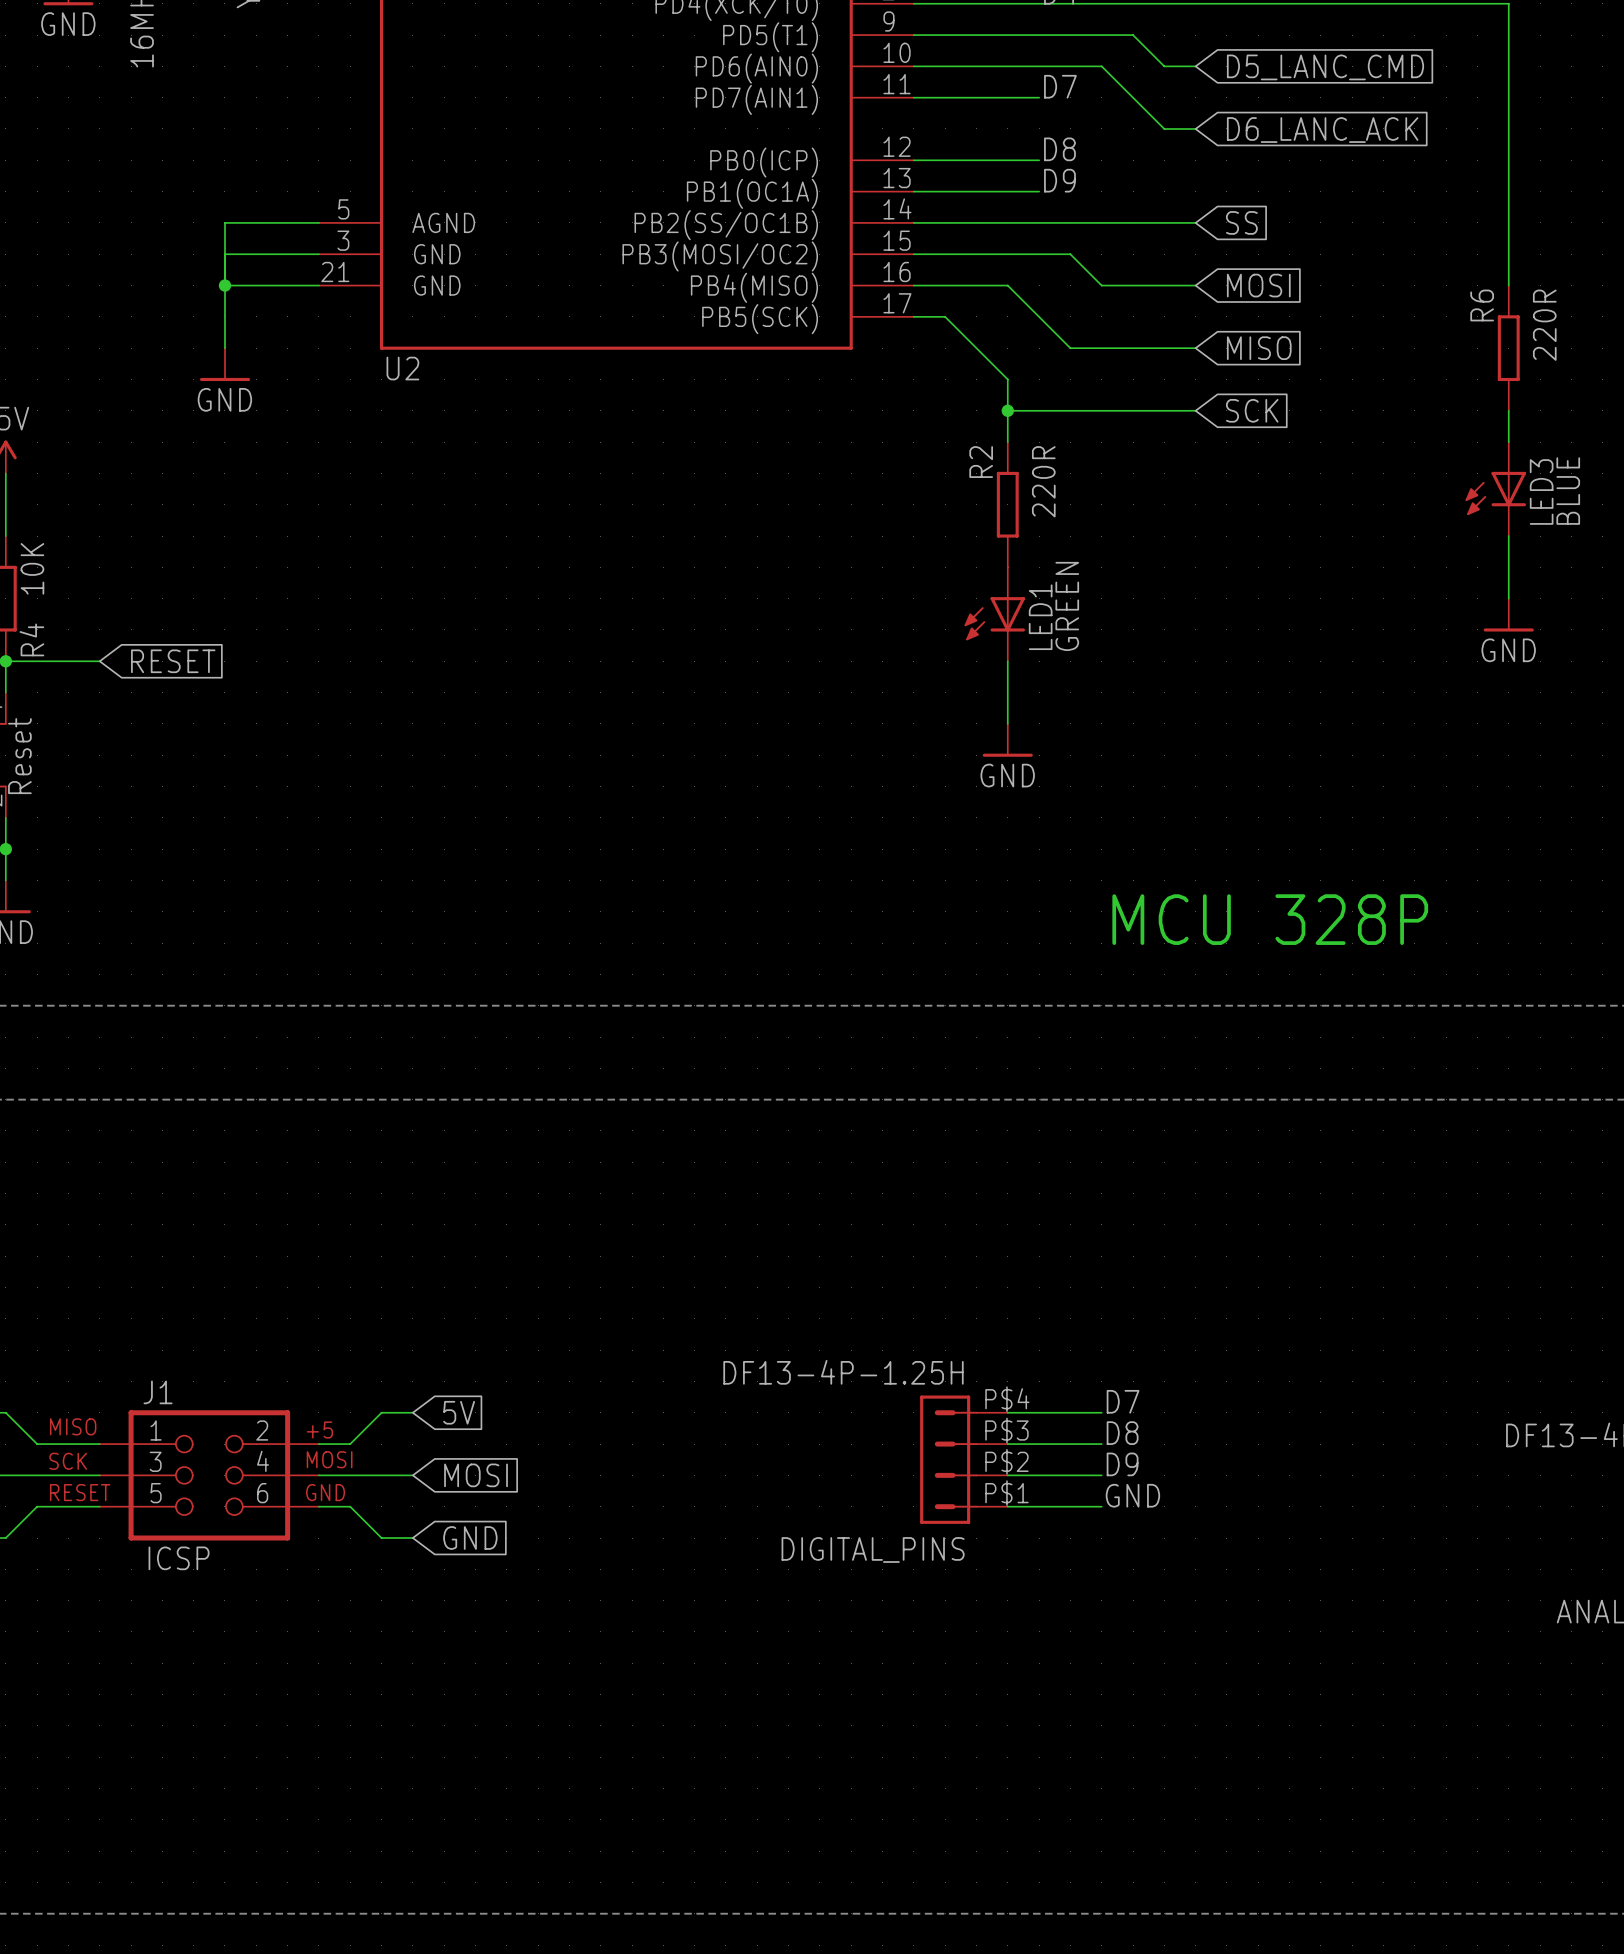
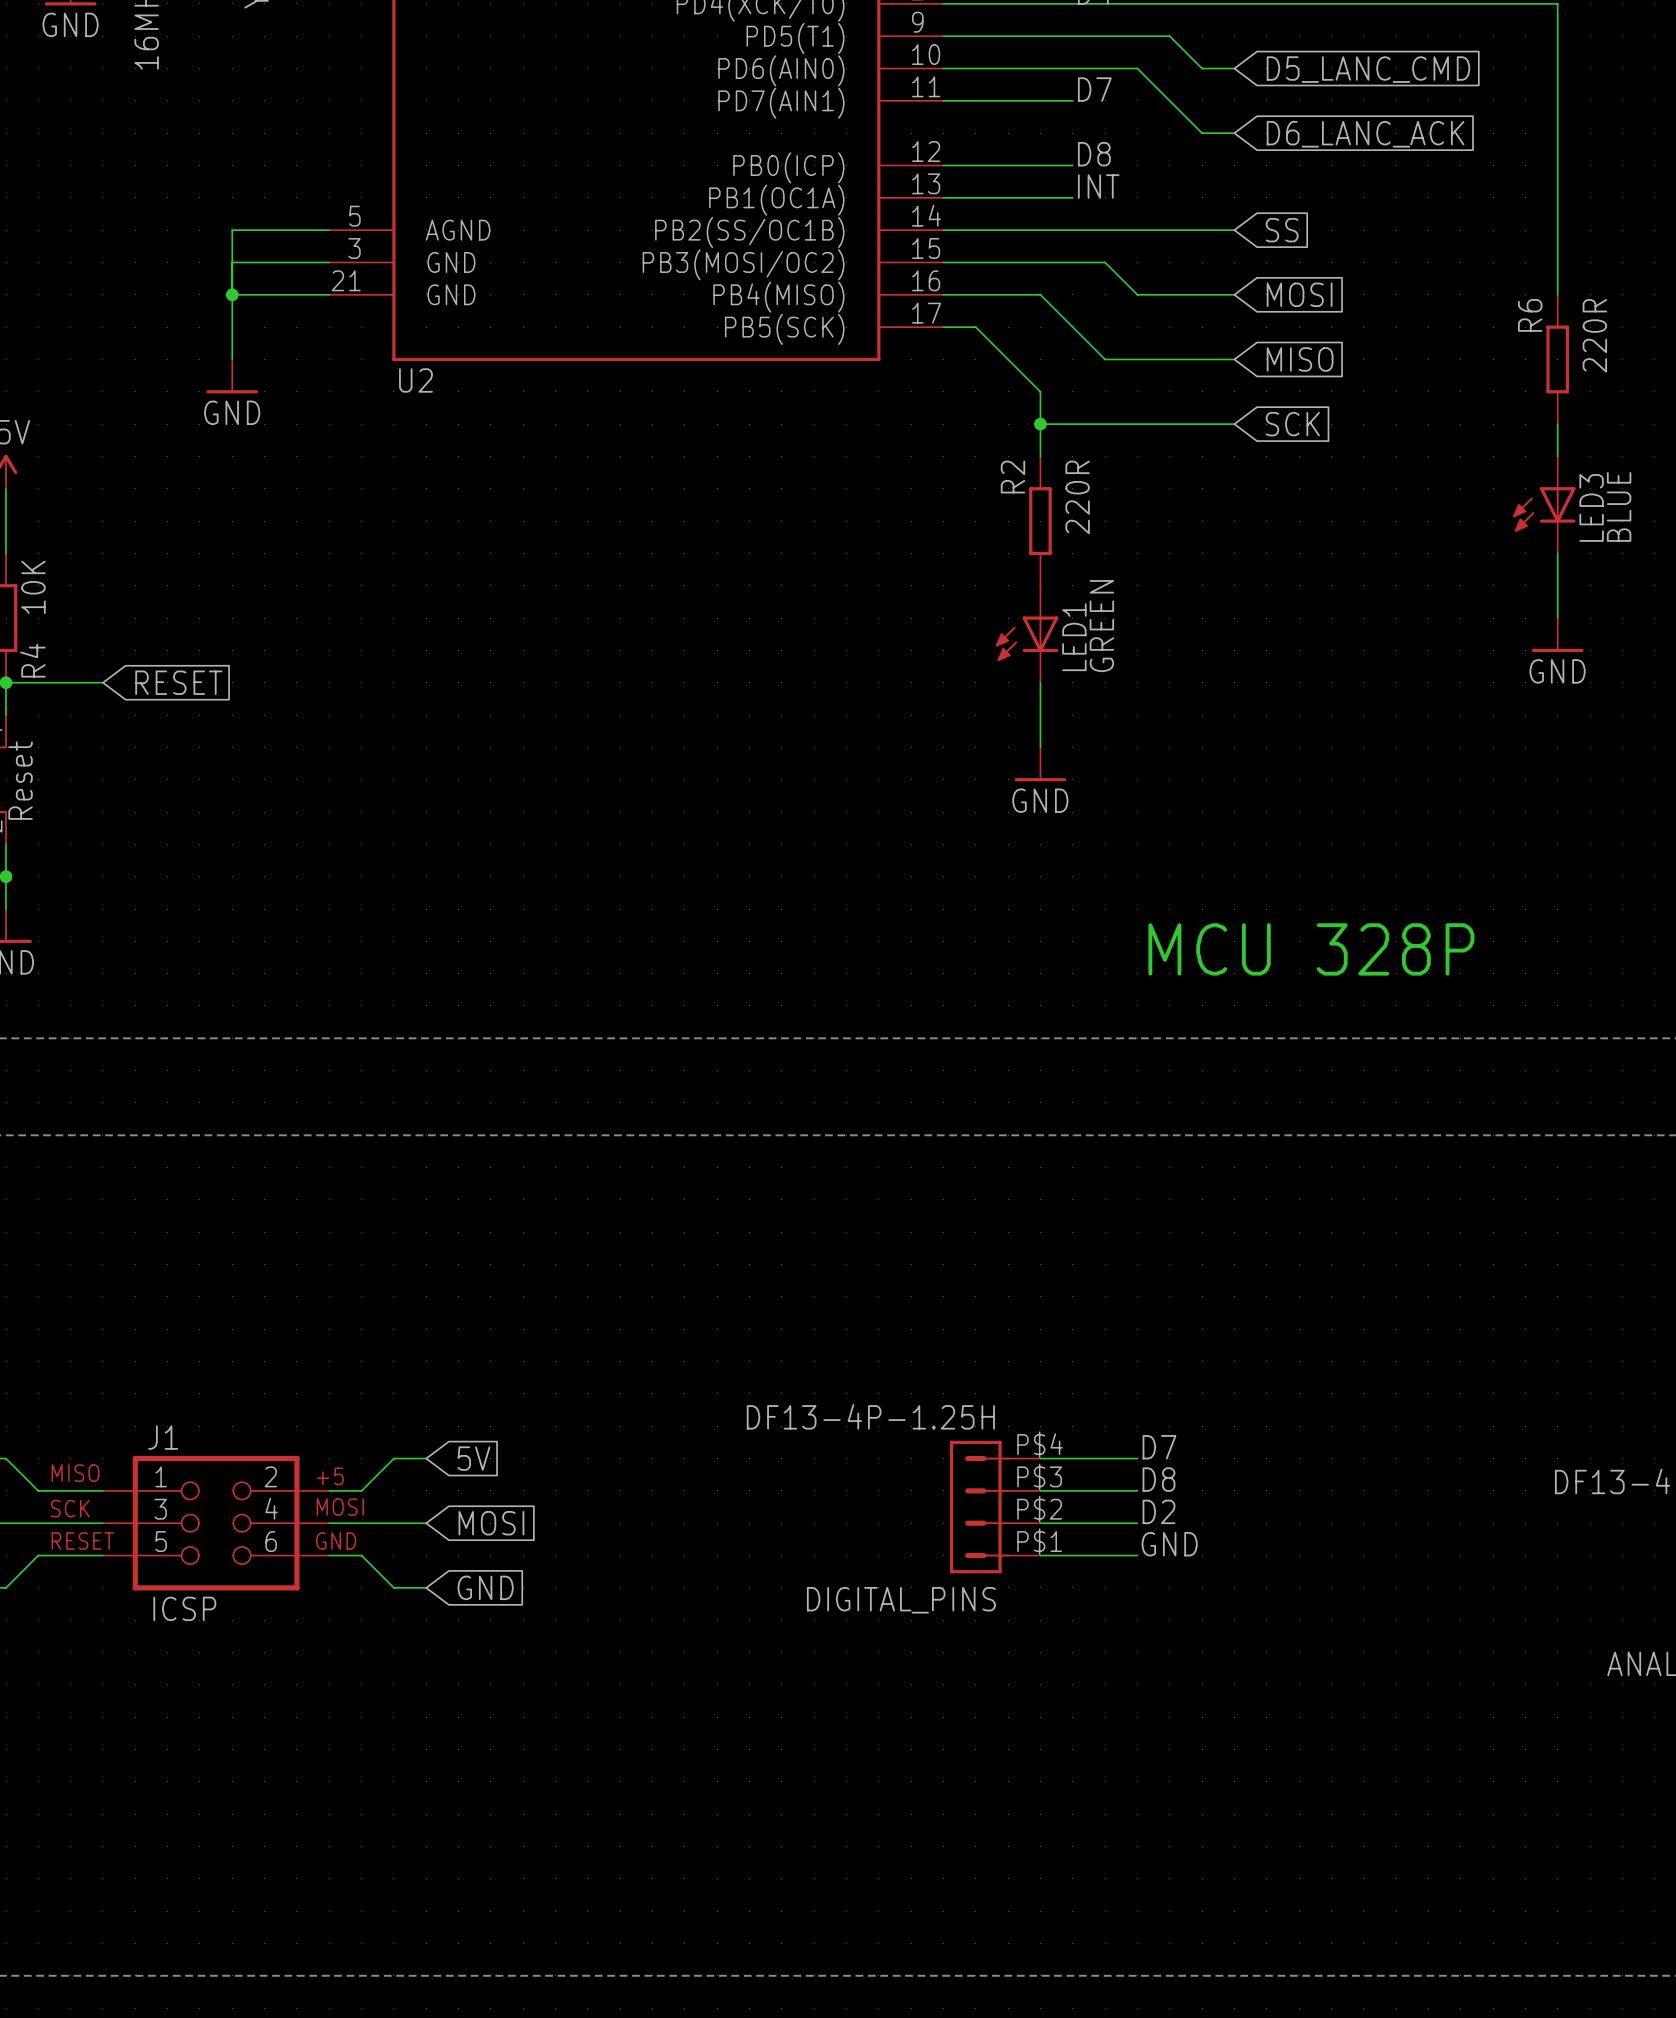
label: D9 (1059, 180) -> INT (1098, 186)
label: D9 (1122, 1464) -> D2 (1158, 1511)

